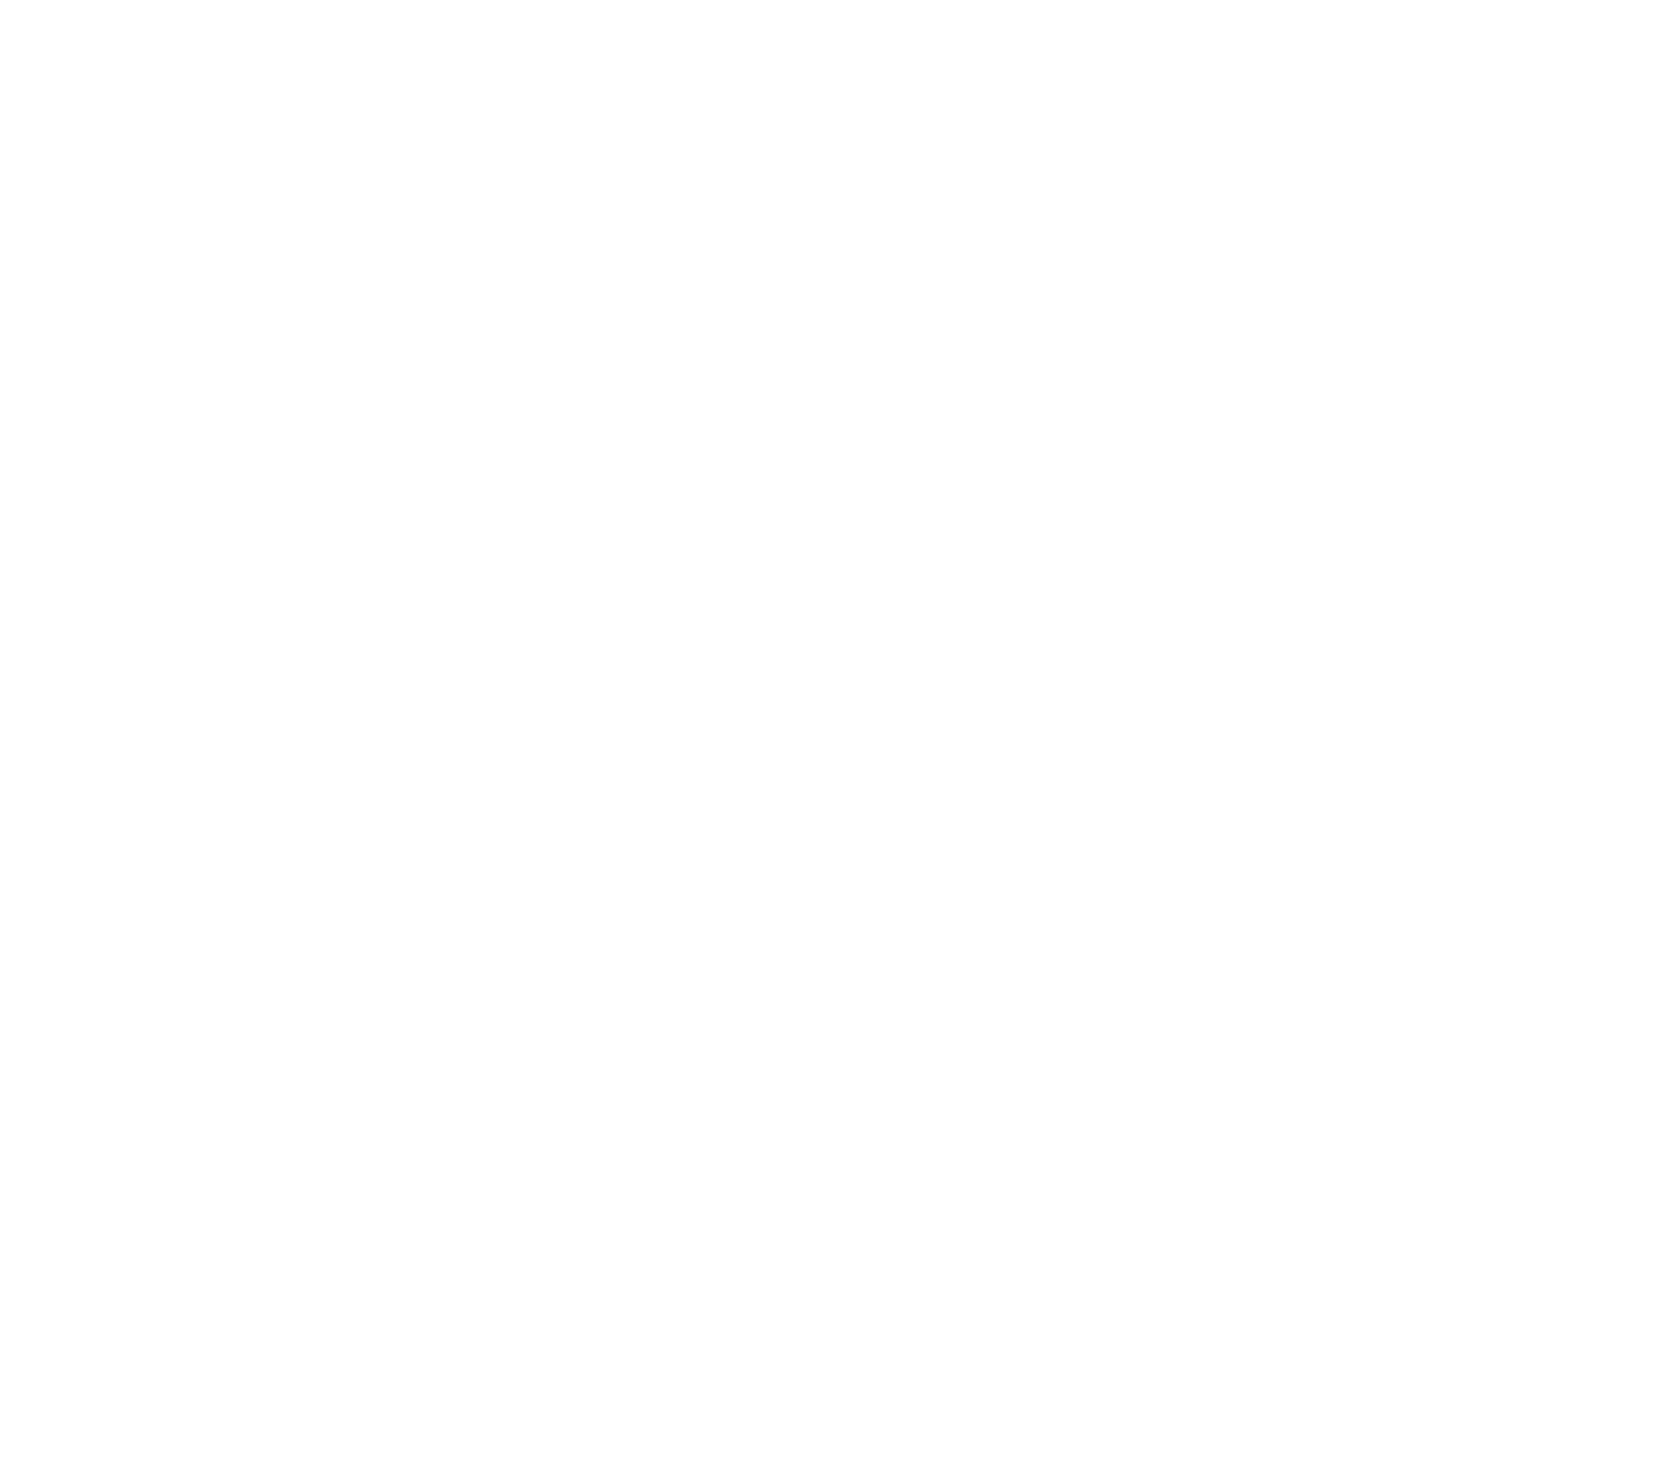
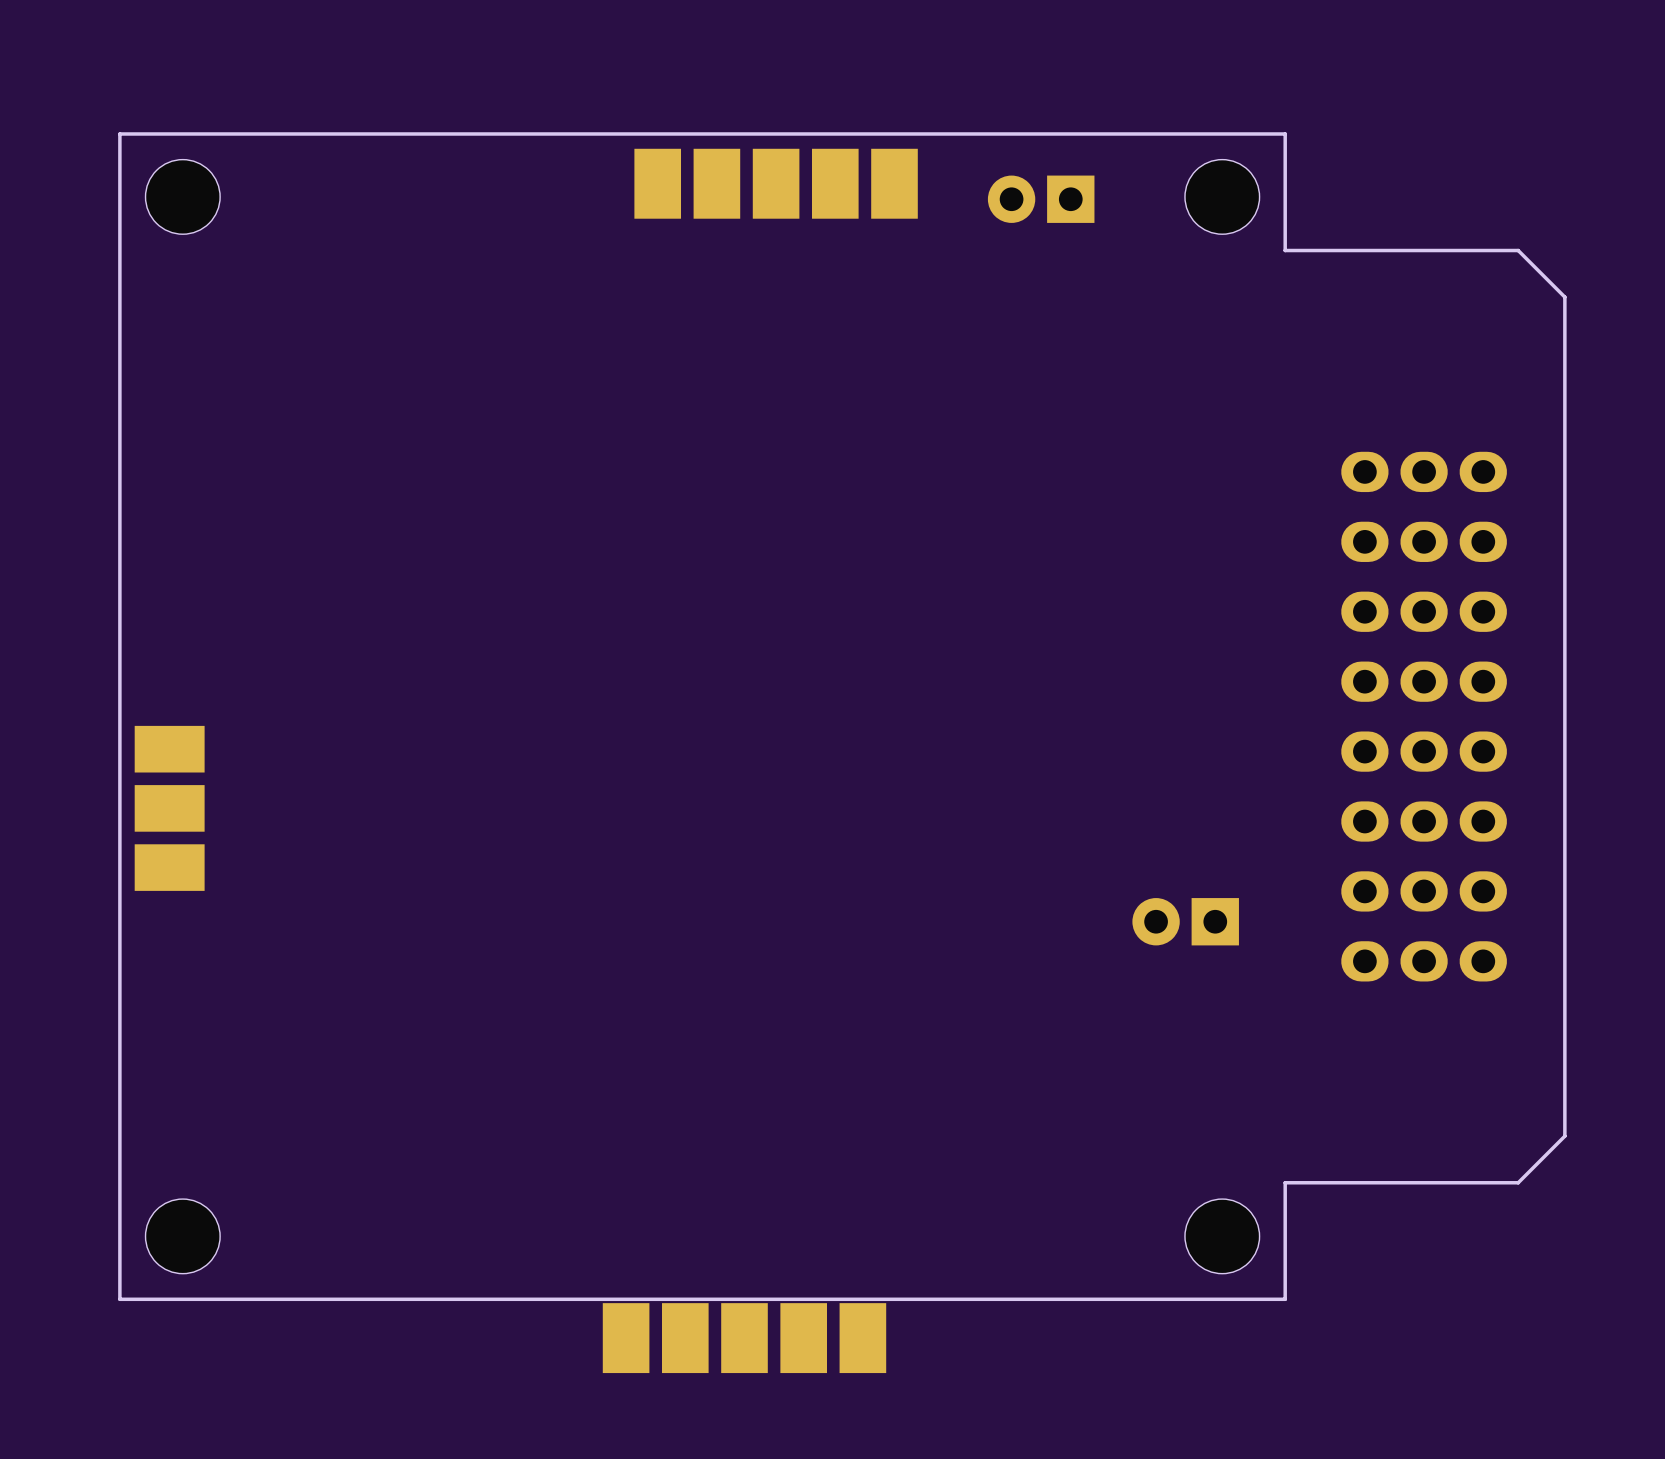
board edge: none -> (1285, 133) (1285, 250) (1518, 250) (1564, 297) (1564, 1136) (1518, 1182) (1285, 1182) (1285, 1299) (119, 1299) (119, 133) (1285, 133)
part: none -> (776, 183)
part: none -> (182, 196)
part: none -> (1222, 196)
part: none -> (1041, 199)
part: none -> (1364, 716)
part: none -> (1424, 716)
part: none -> (1483, 716)
part: none -> (169, 808)
part: none -> (1185, 921)
part: none -> (182, 1236)
part: none -> (1222, 1236)
part: none -> (744, 1338)

